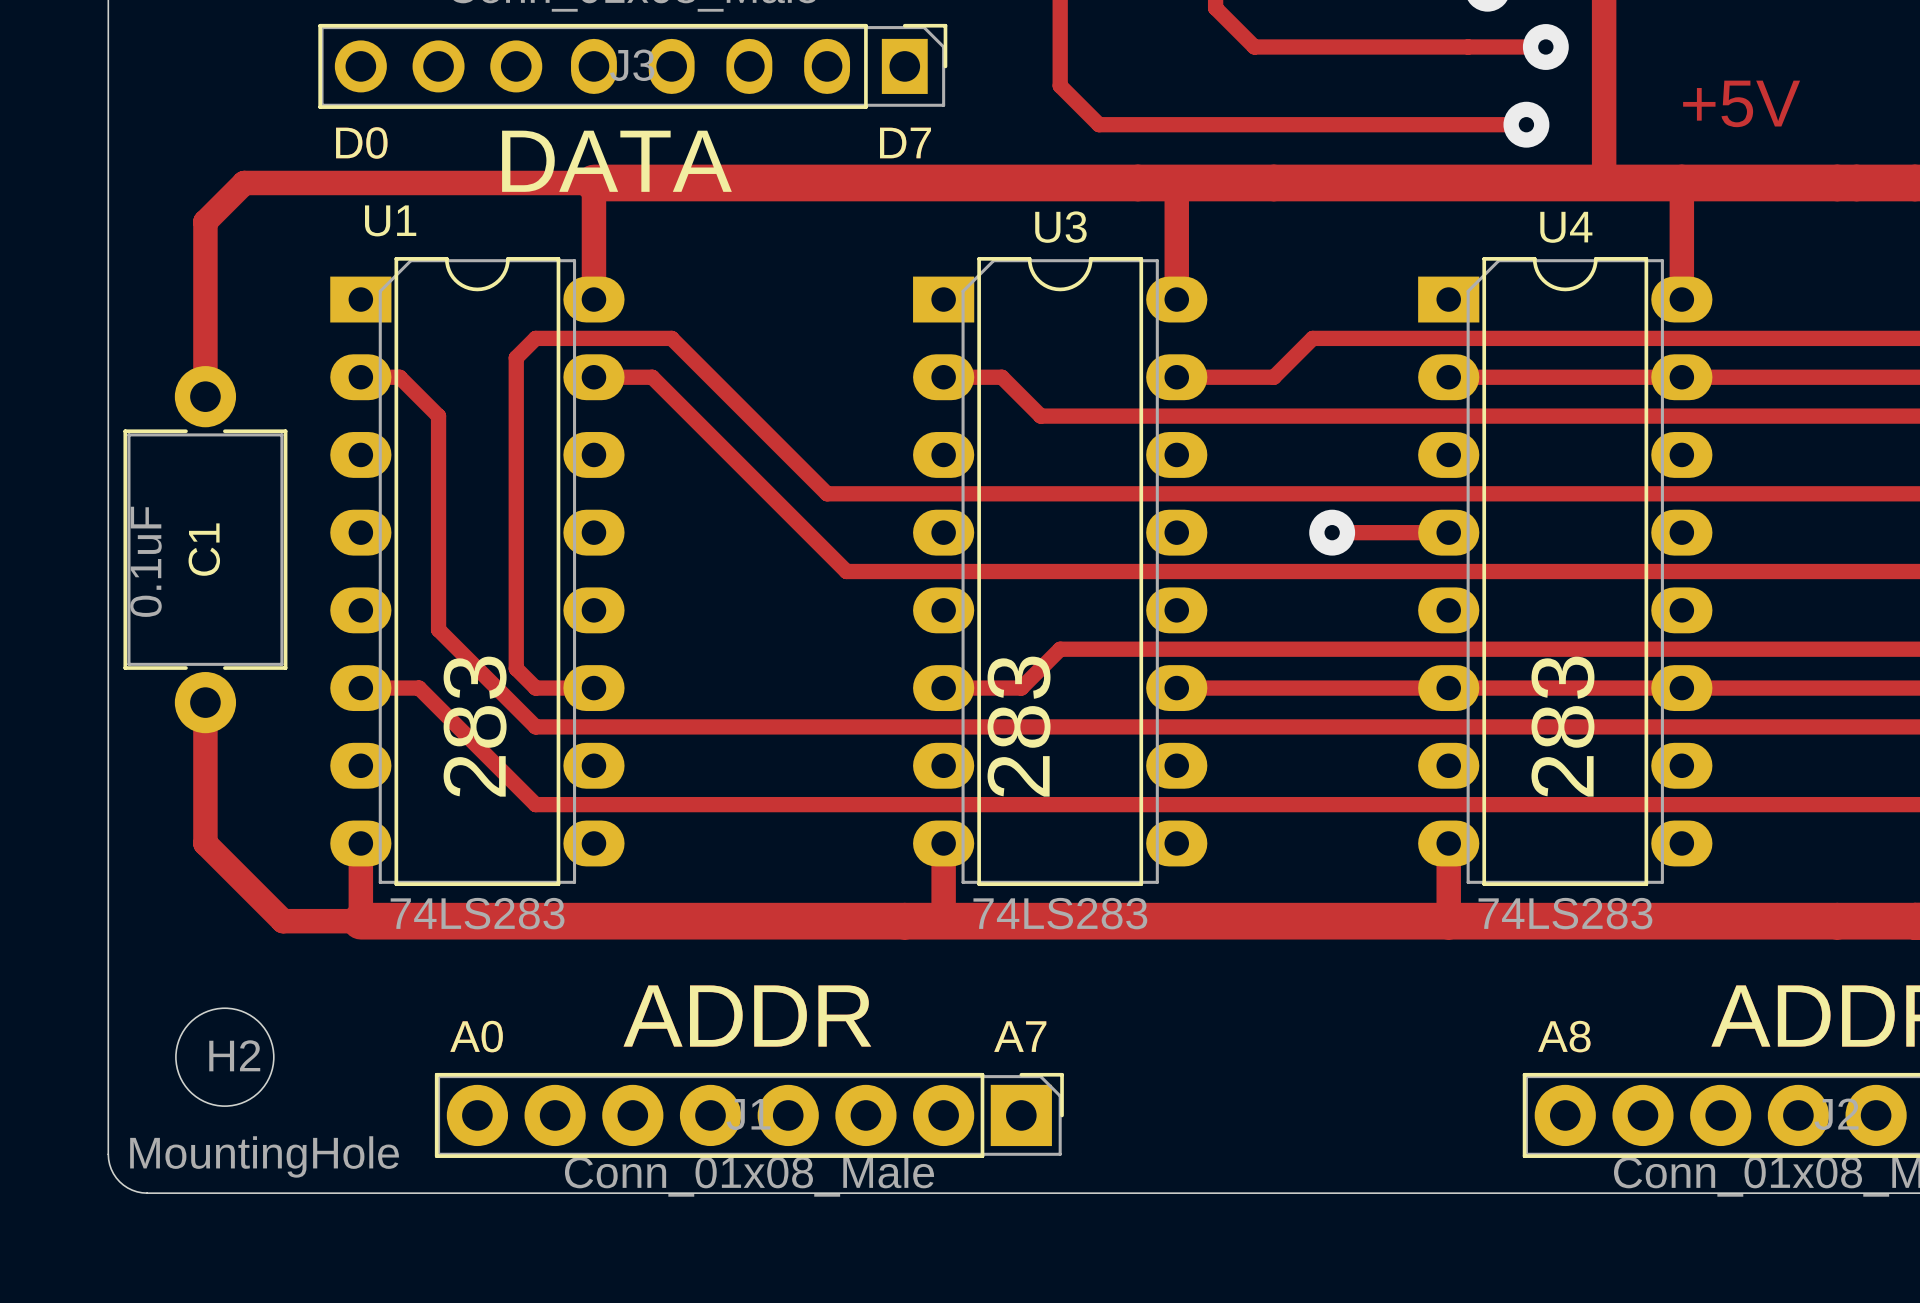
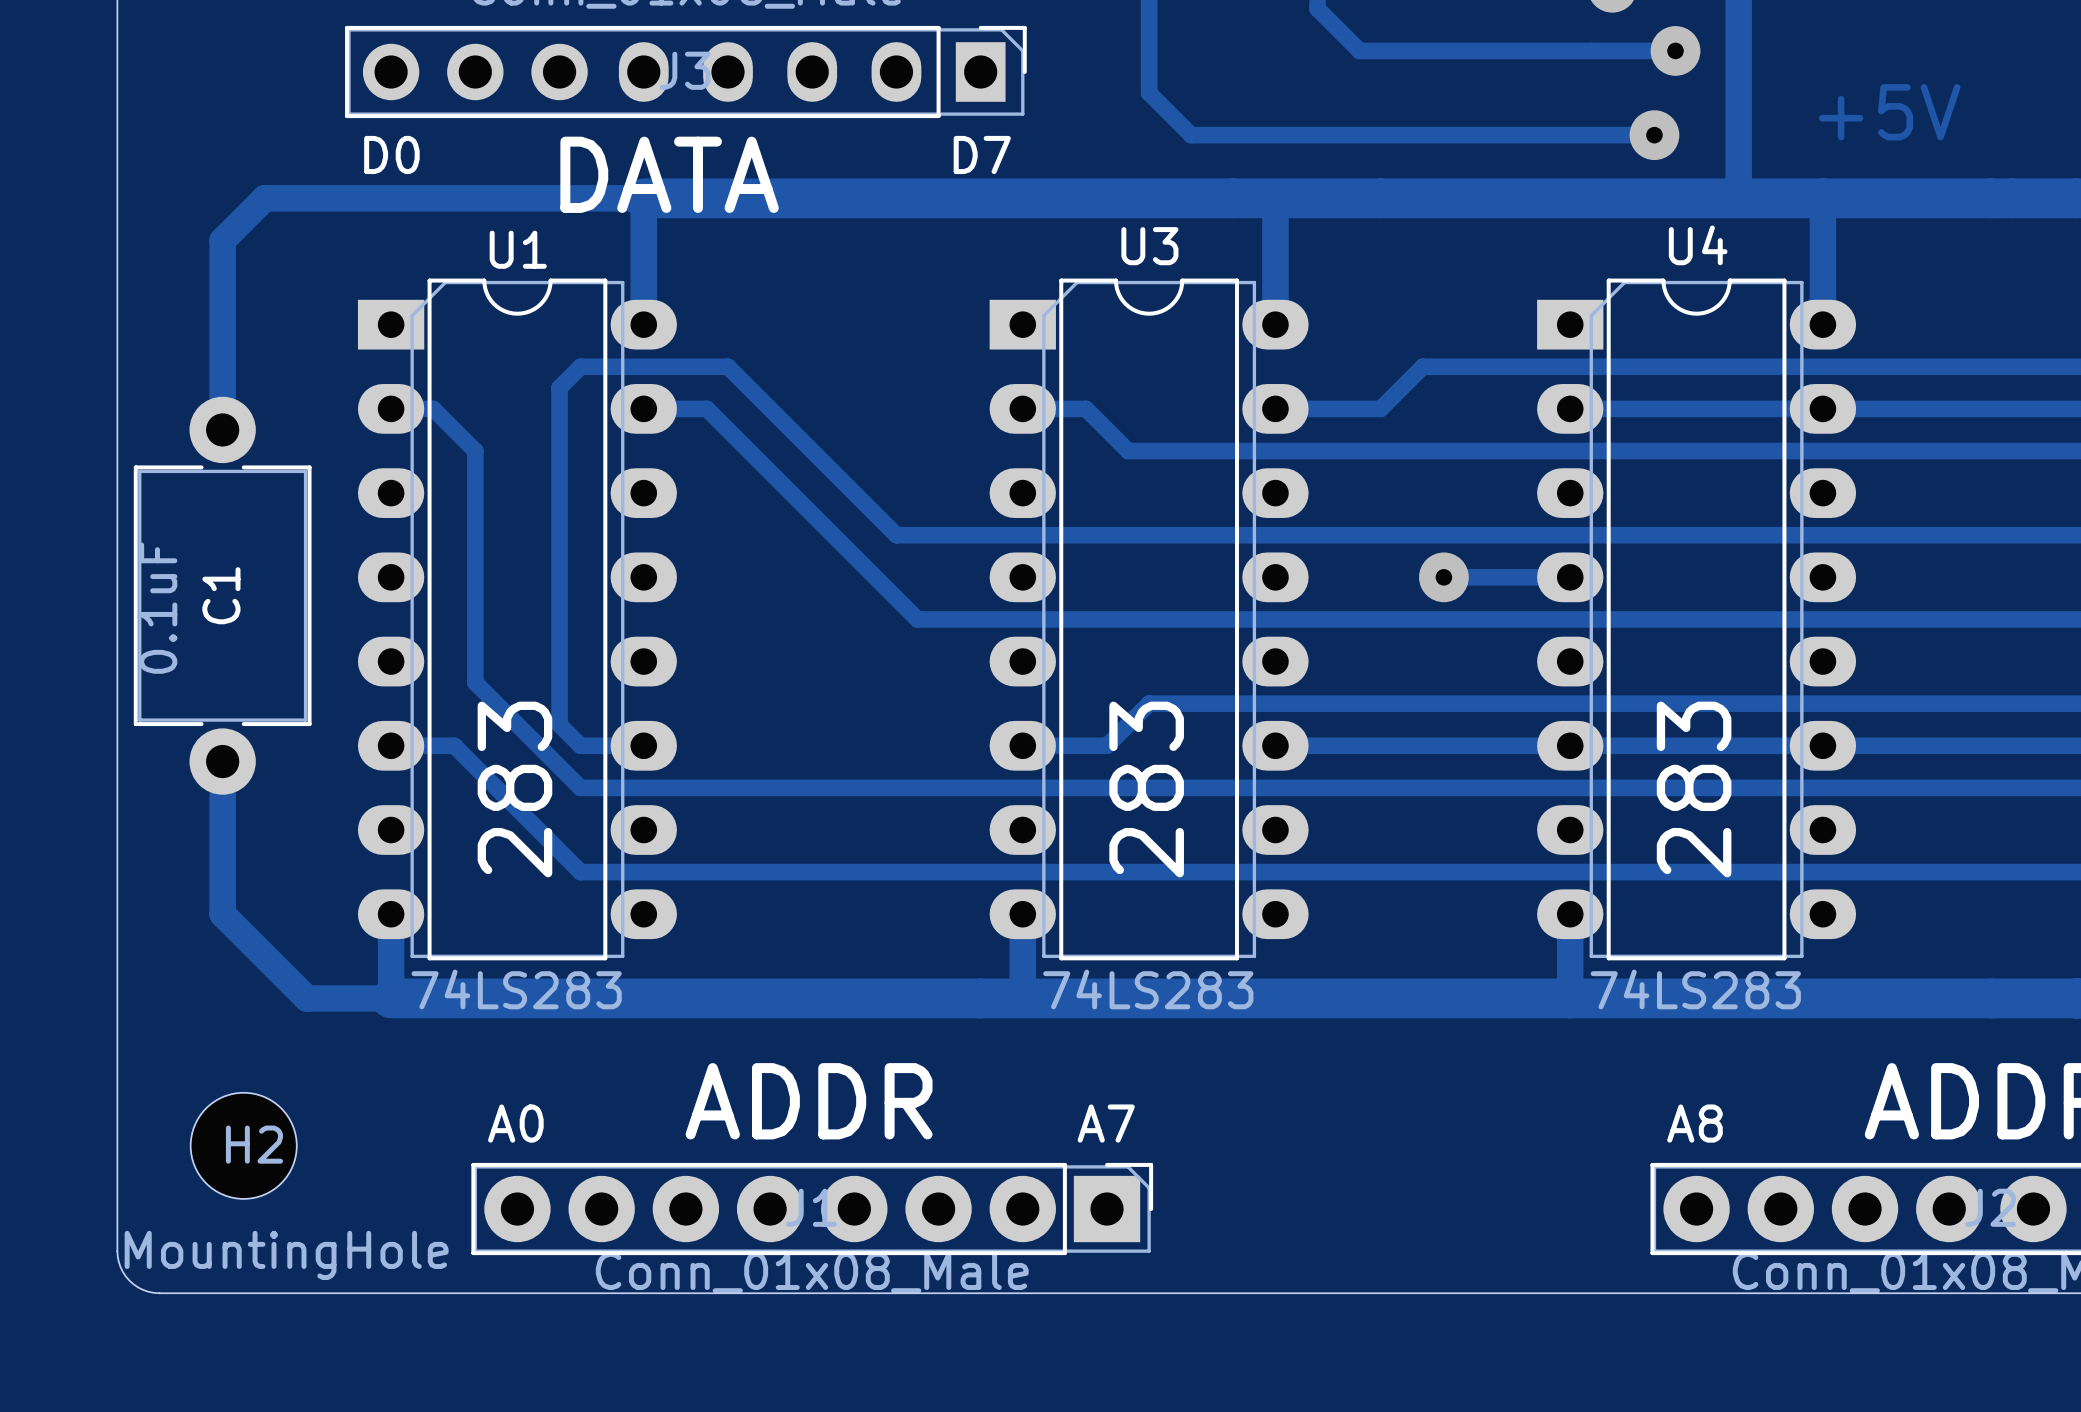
U1 name position: U1 (390, 220) -> U1 (518, 249)
text position: 283 (1019, 726) -> 283 (1146, 789)

